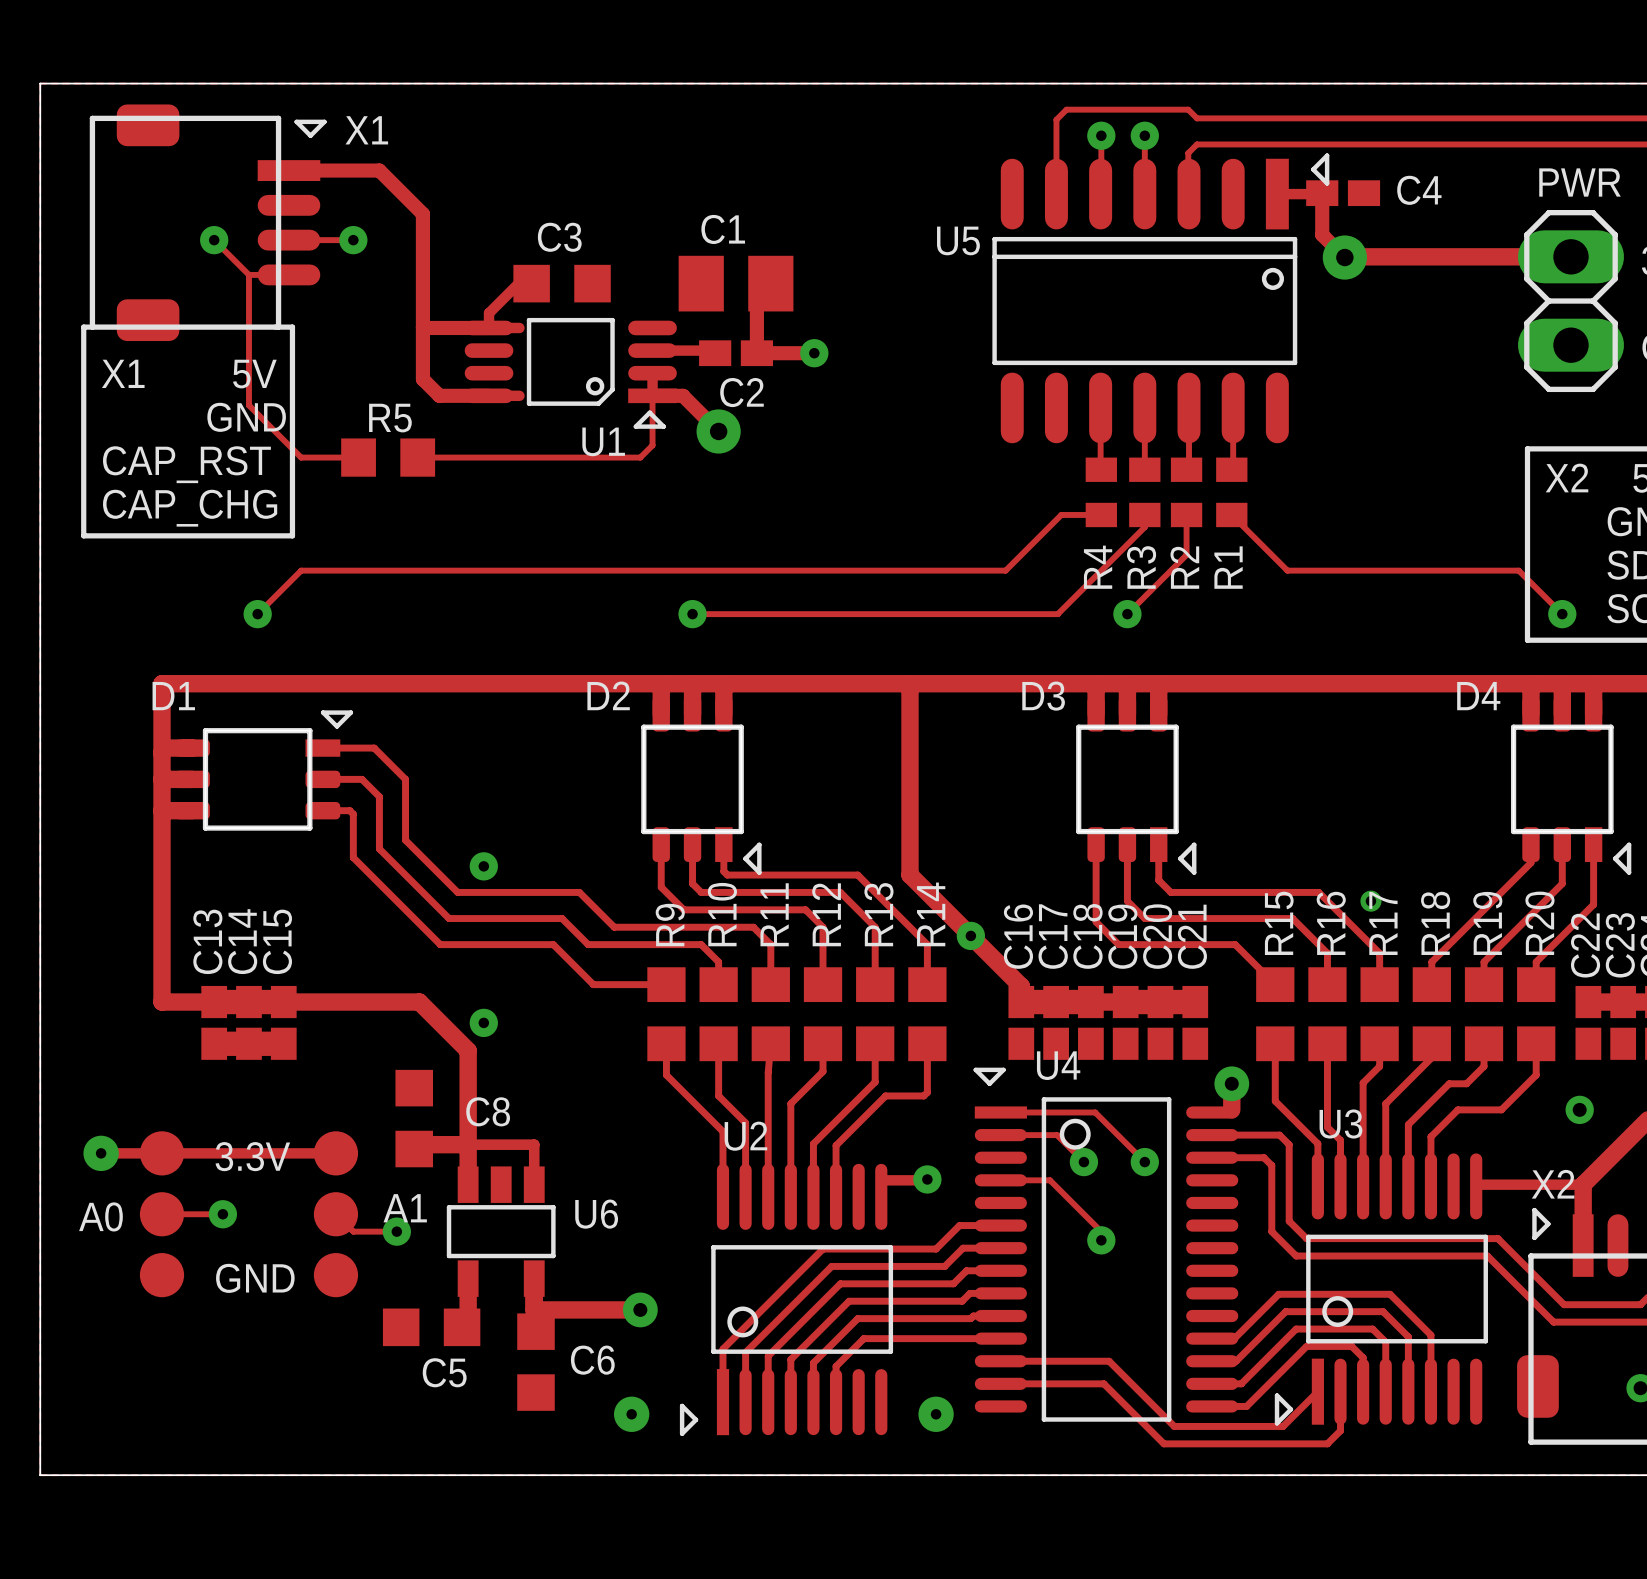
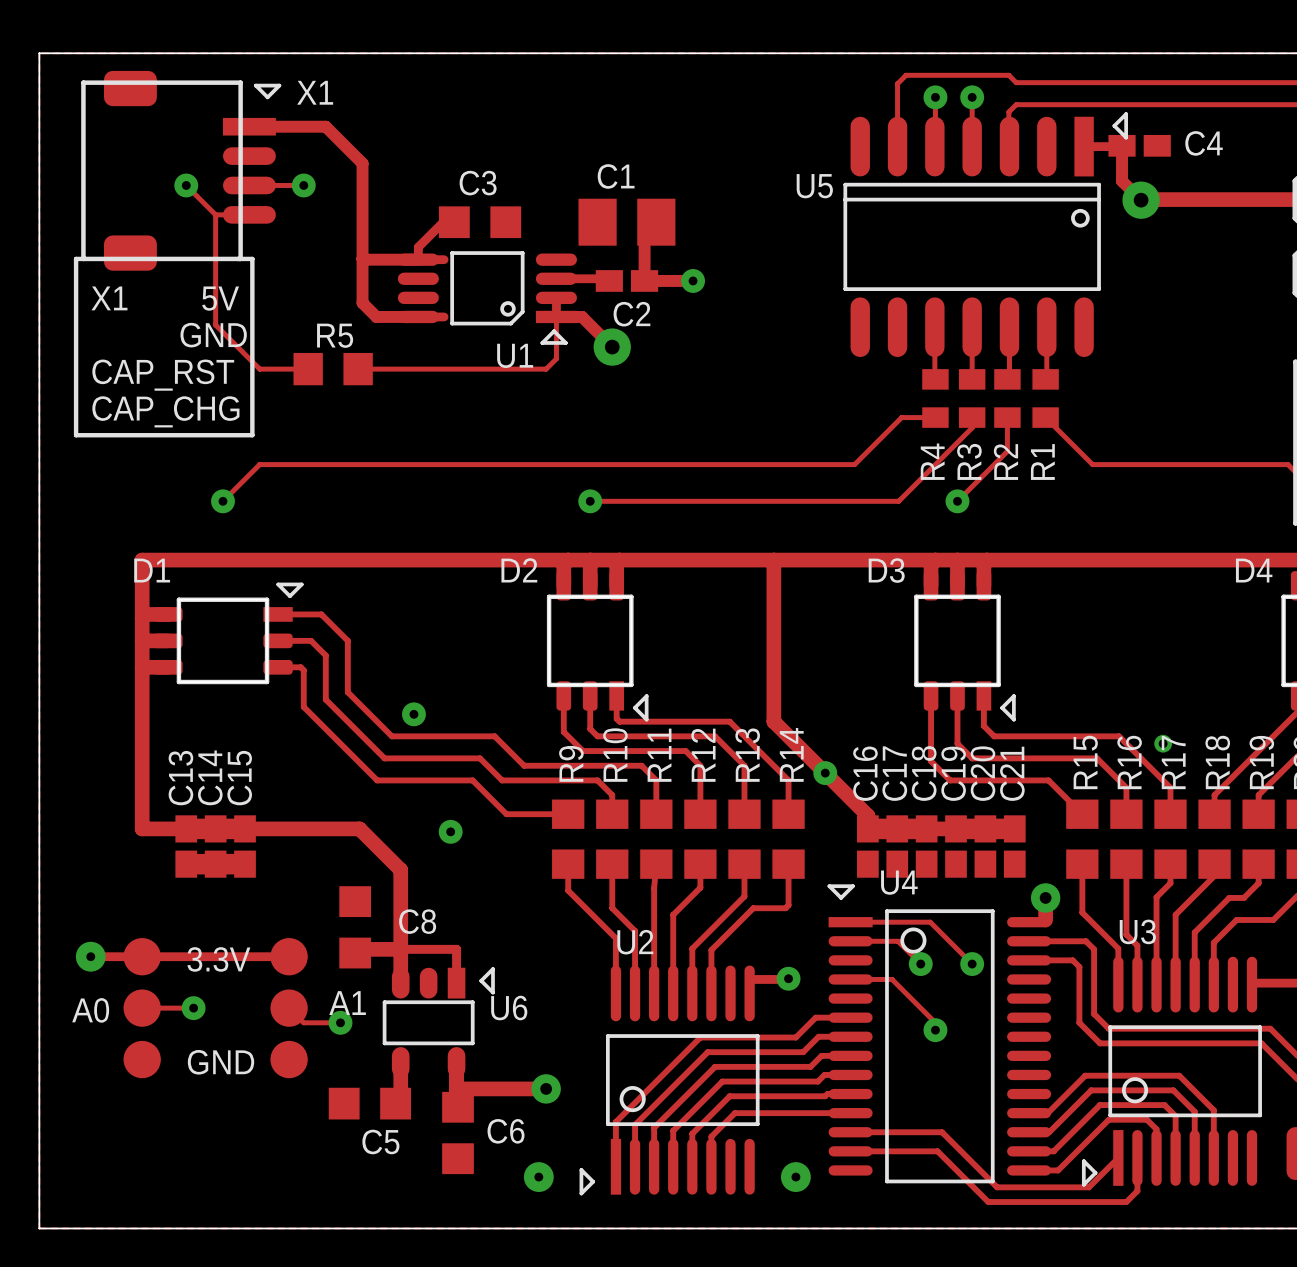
via position: (483, 1022) -> (450, 831)
U6 footprint: [446, 1166, 556, 1297] -> [382, 967, 495, 1078]

